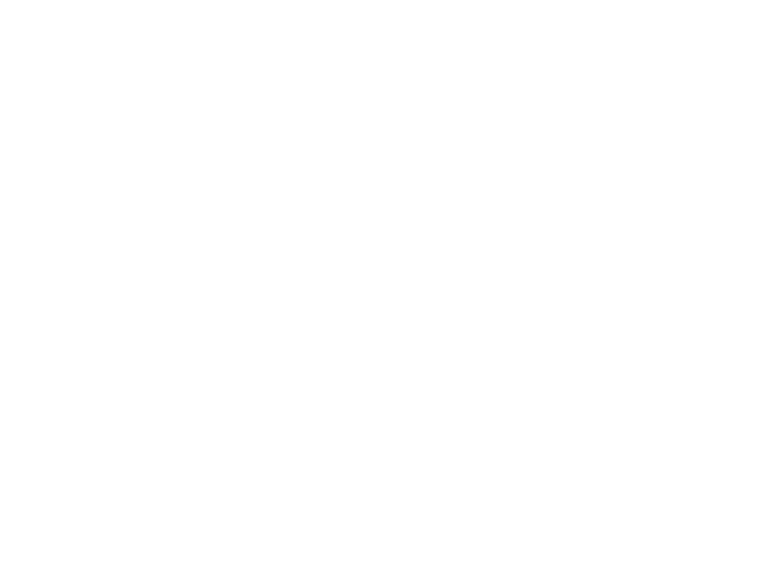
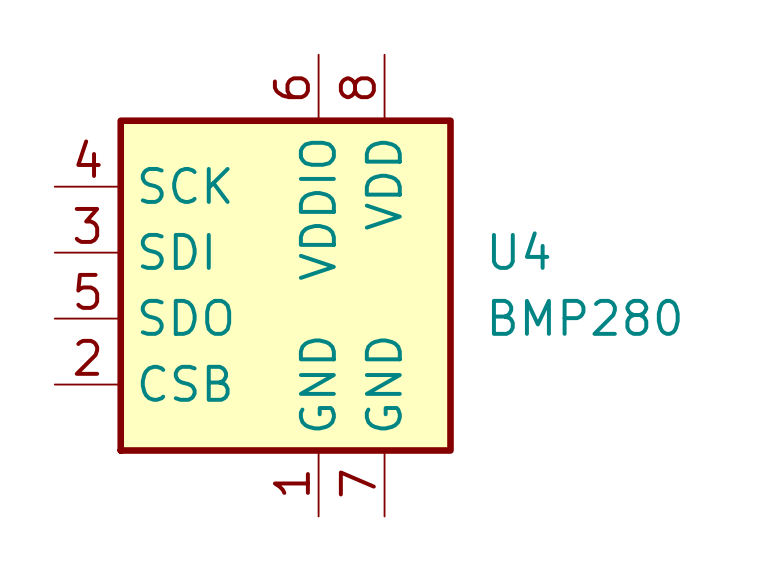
U4: none -> BMP280 (254, 285)

